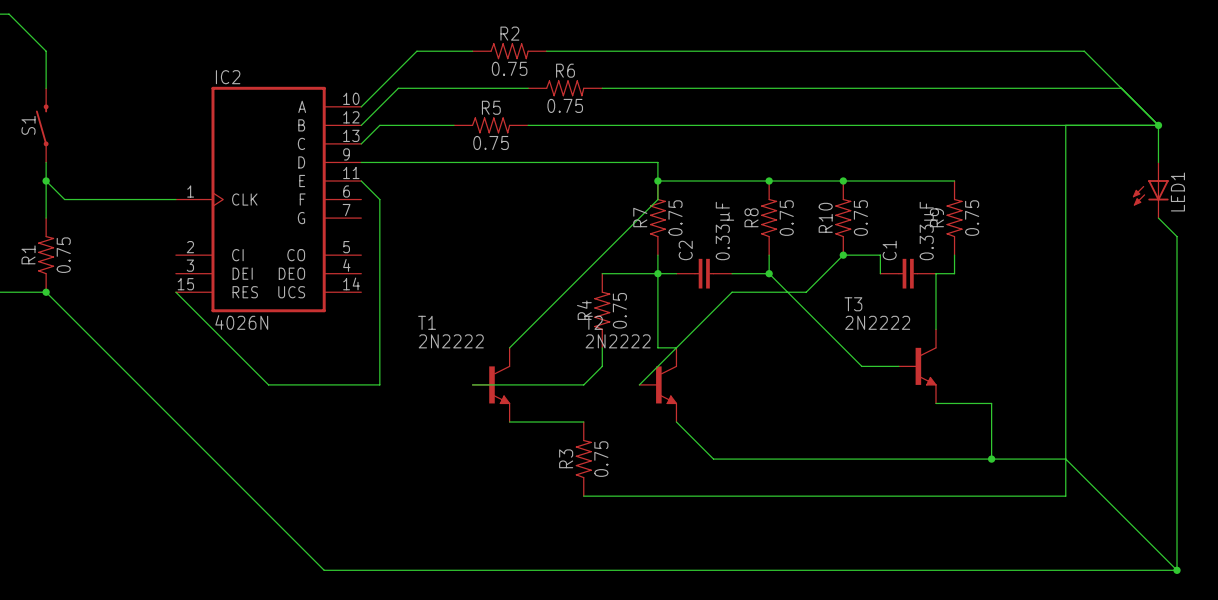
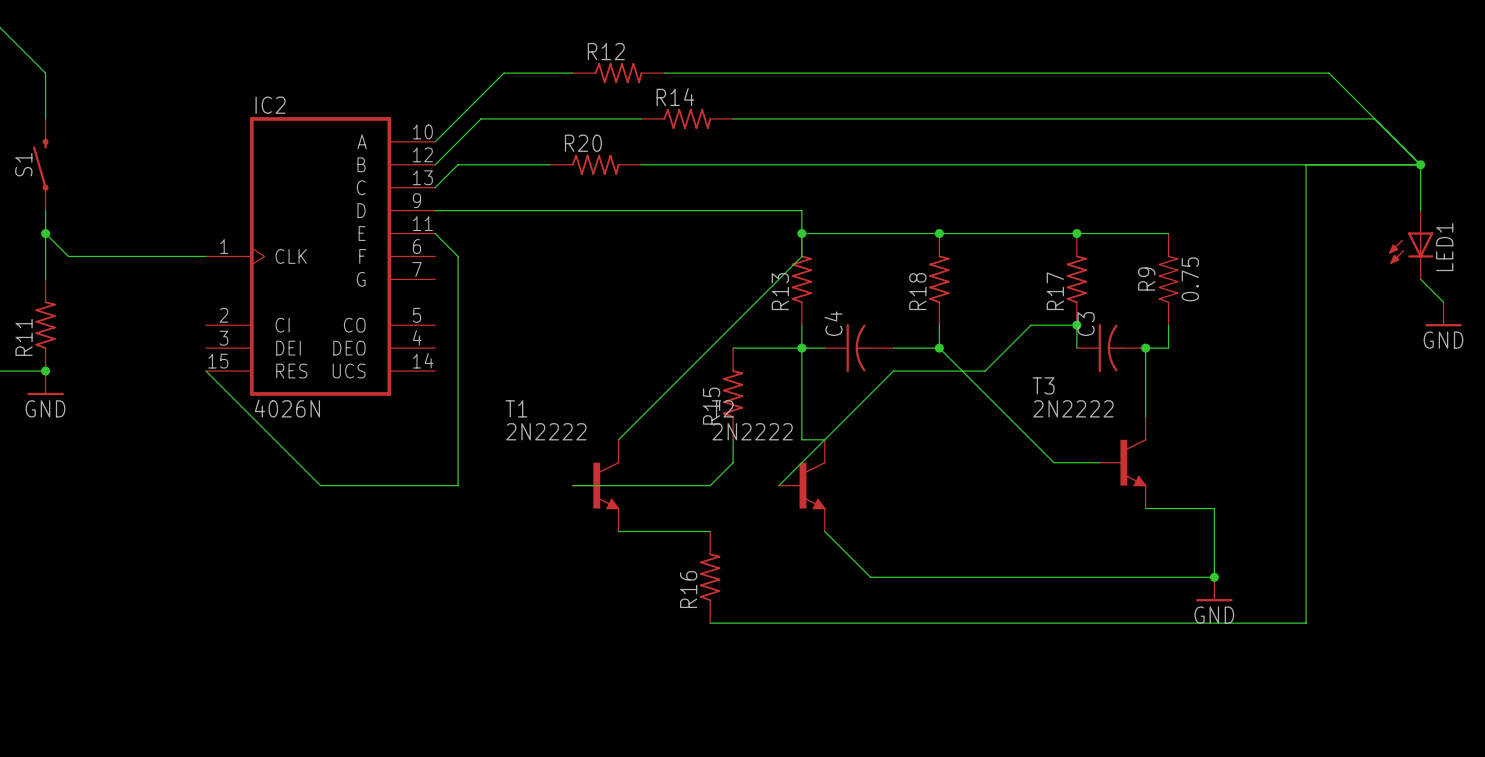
R2: 0.75 (509, 51) -> none
R12: none -> (618, 73)
R6: 0.75 (565, 88) -> none
R14: none -> (687, 118)
R5: 0.75 (491, 125) -> none
R20: none -> (595, 164)
junction position: (843, 180) -> (1076, 233)
R7: 0.75 (657, 218) -> none
R13: none -> (801, 279)
R8: 0.75 (769, 218) -> none
R18: none -> (939, 279)
R10: 0.75 (843, 218) -> none
R17: none -> (1076, 279)
wire: (1177, 236) (1177, 570) -> none
power symbol: none -> GND (1443, 314)
R1: 0.75 (46, 255) -> none
R11: none -> (45, 325)
junction position: (843, 255) -> (1076, 325)
C2: 0.33µF (704, 273) -> none
C4: none -> (859, 348)
C1: 0.33µF (908, 273) -> none
C3: none -> (1111, 348)
junction: none -> (1145, 348)
wire: (46, 292) (324, 570) (1177, 570) -> none
power symbol: none -> GND (45, 383)
R4: 0.75 (602, 310) -> none
R15: none -> (733, 393)
R3: 0.75 (583, 459) -> none
R16: none -> (710, 577)
wire: (991, 459) (1065, 459) (1177, 570) -> none
power symbol: none -> GND (1214, 589)
junction: (1177, 570) -> none

